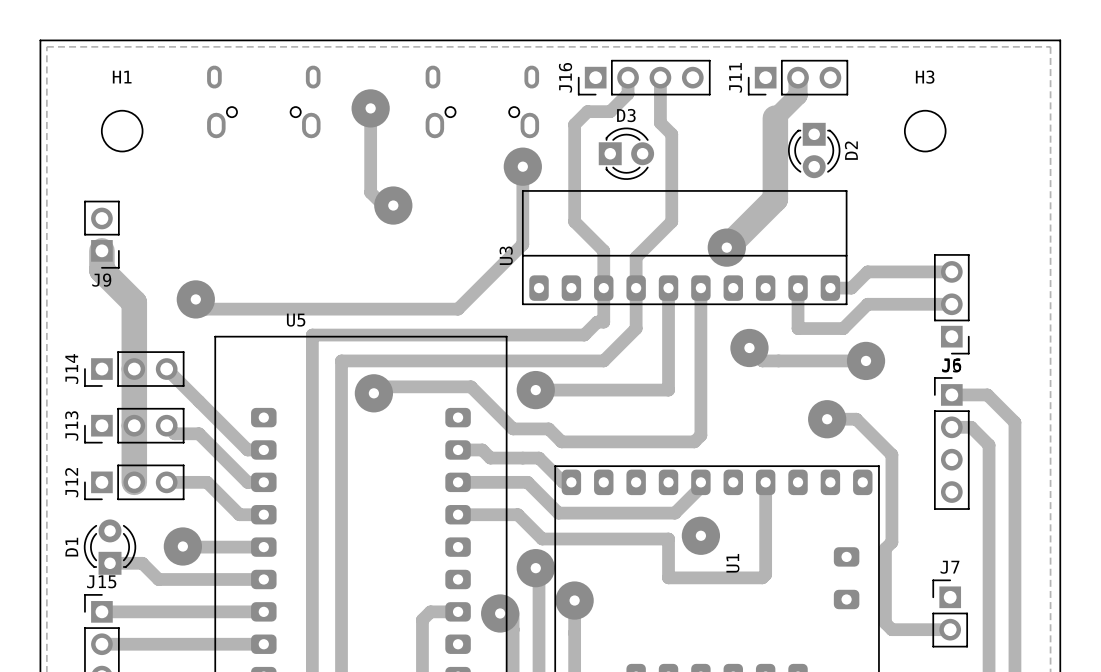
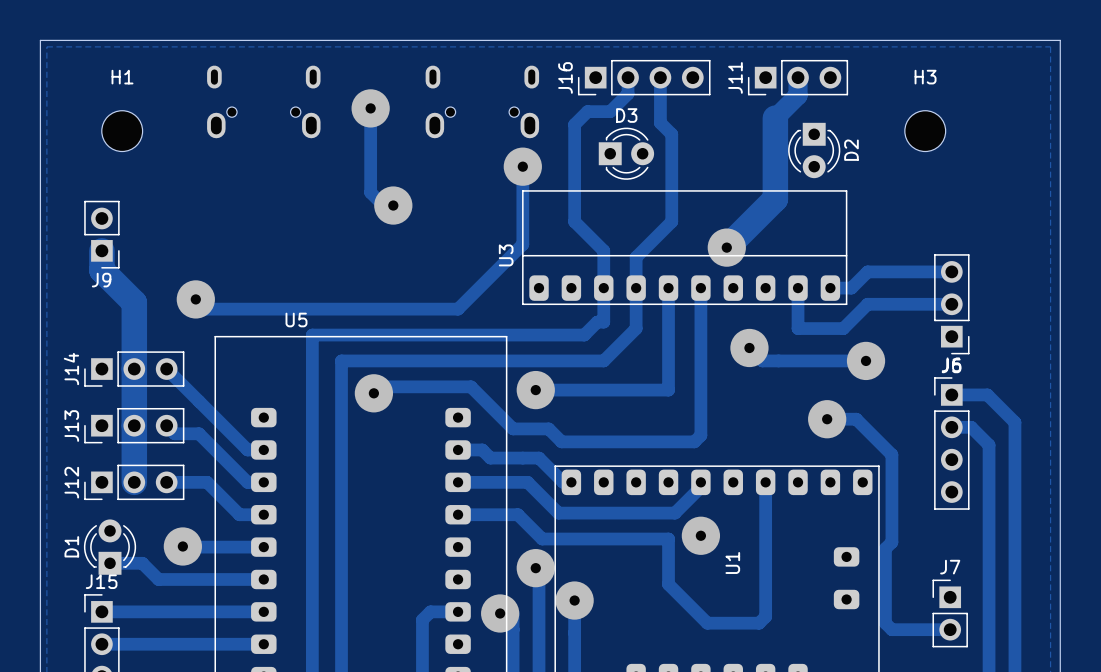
track: (765, 574) (762, 577) (668, 577) -> (765, 574) (765, 616) (759, 623) (707, 623) (668, 584) (668, 577)

